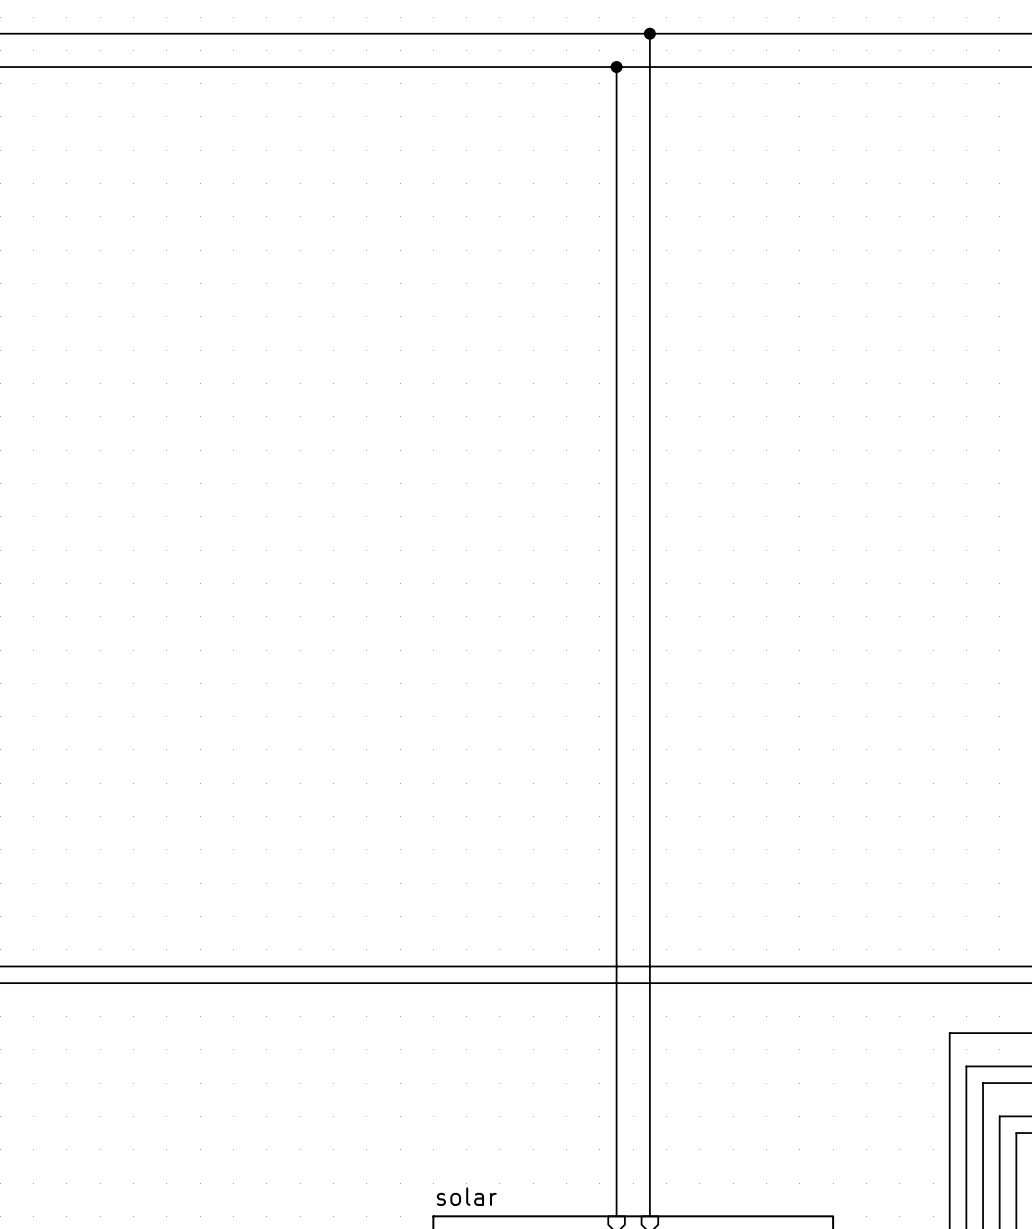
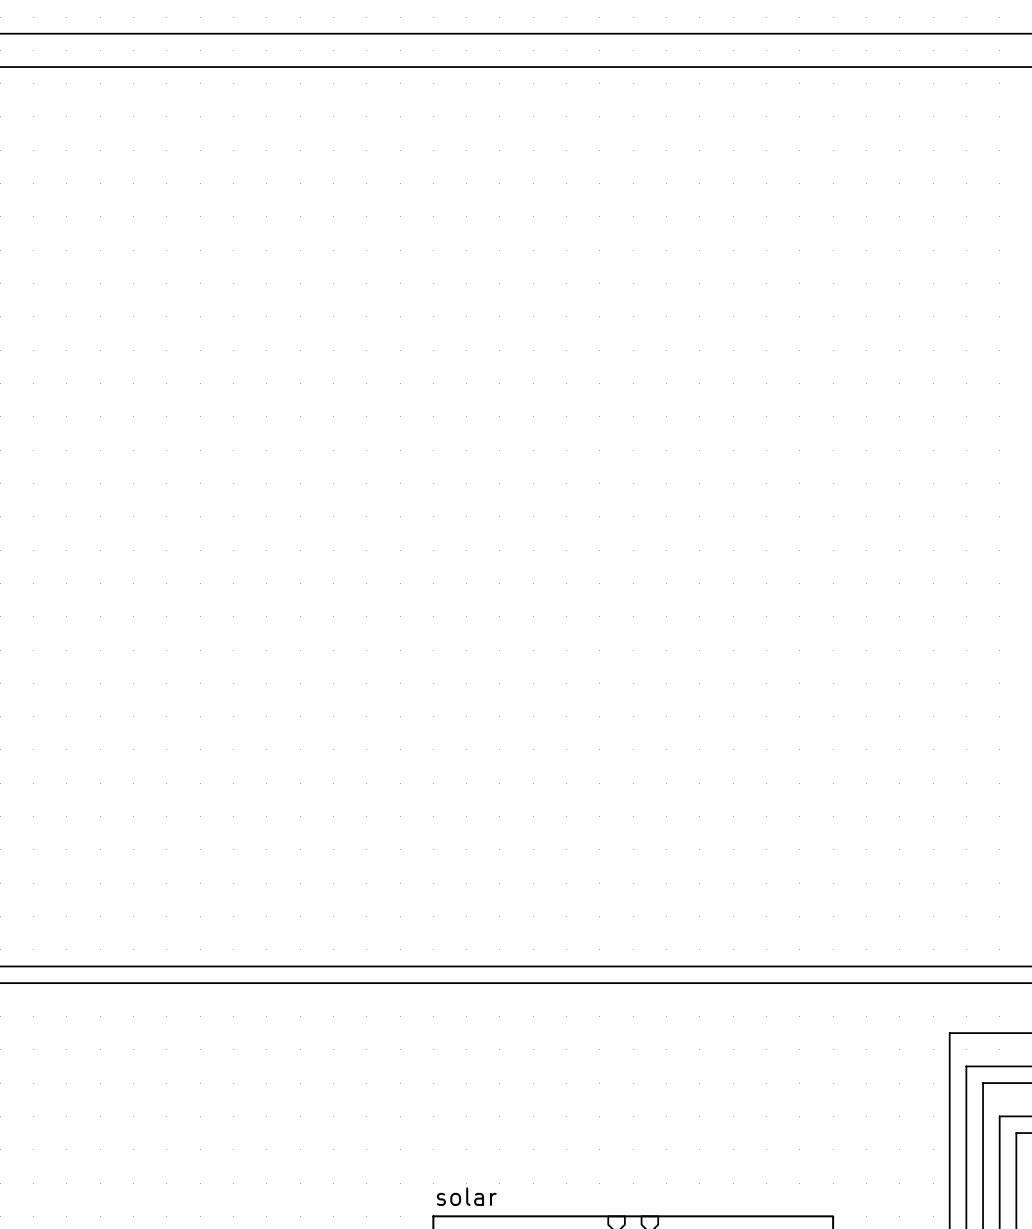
wire: (649, 33) (649, 1216) -> none
junction: (649, 33) -> none
wire: (616, 67) (616, 1216) -> none
junction: (616, 67) -> none

